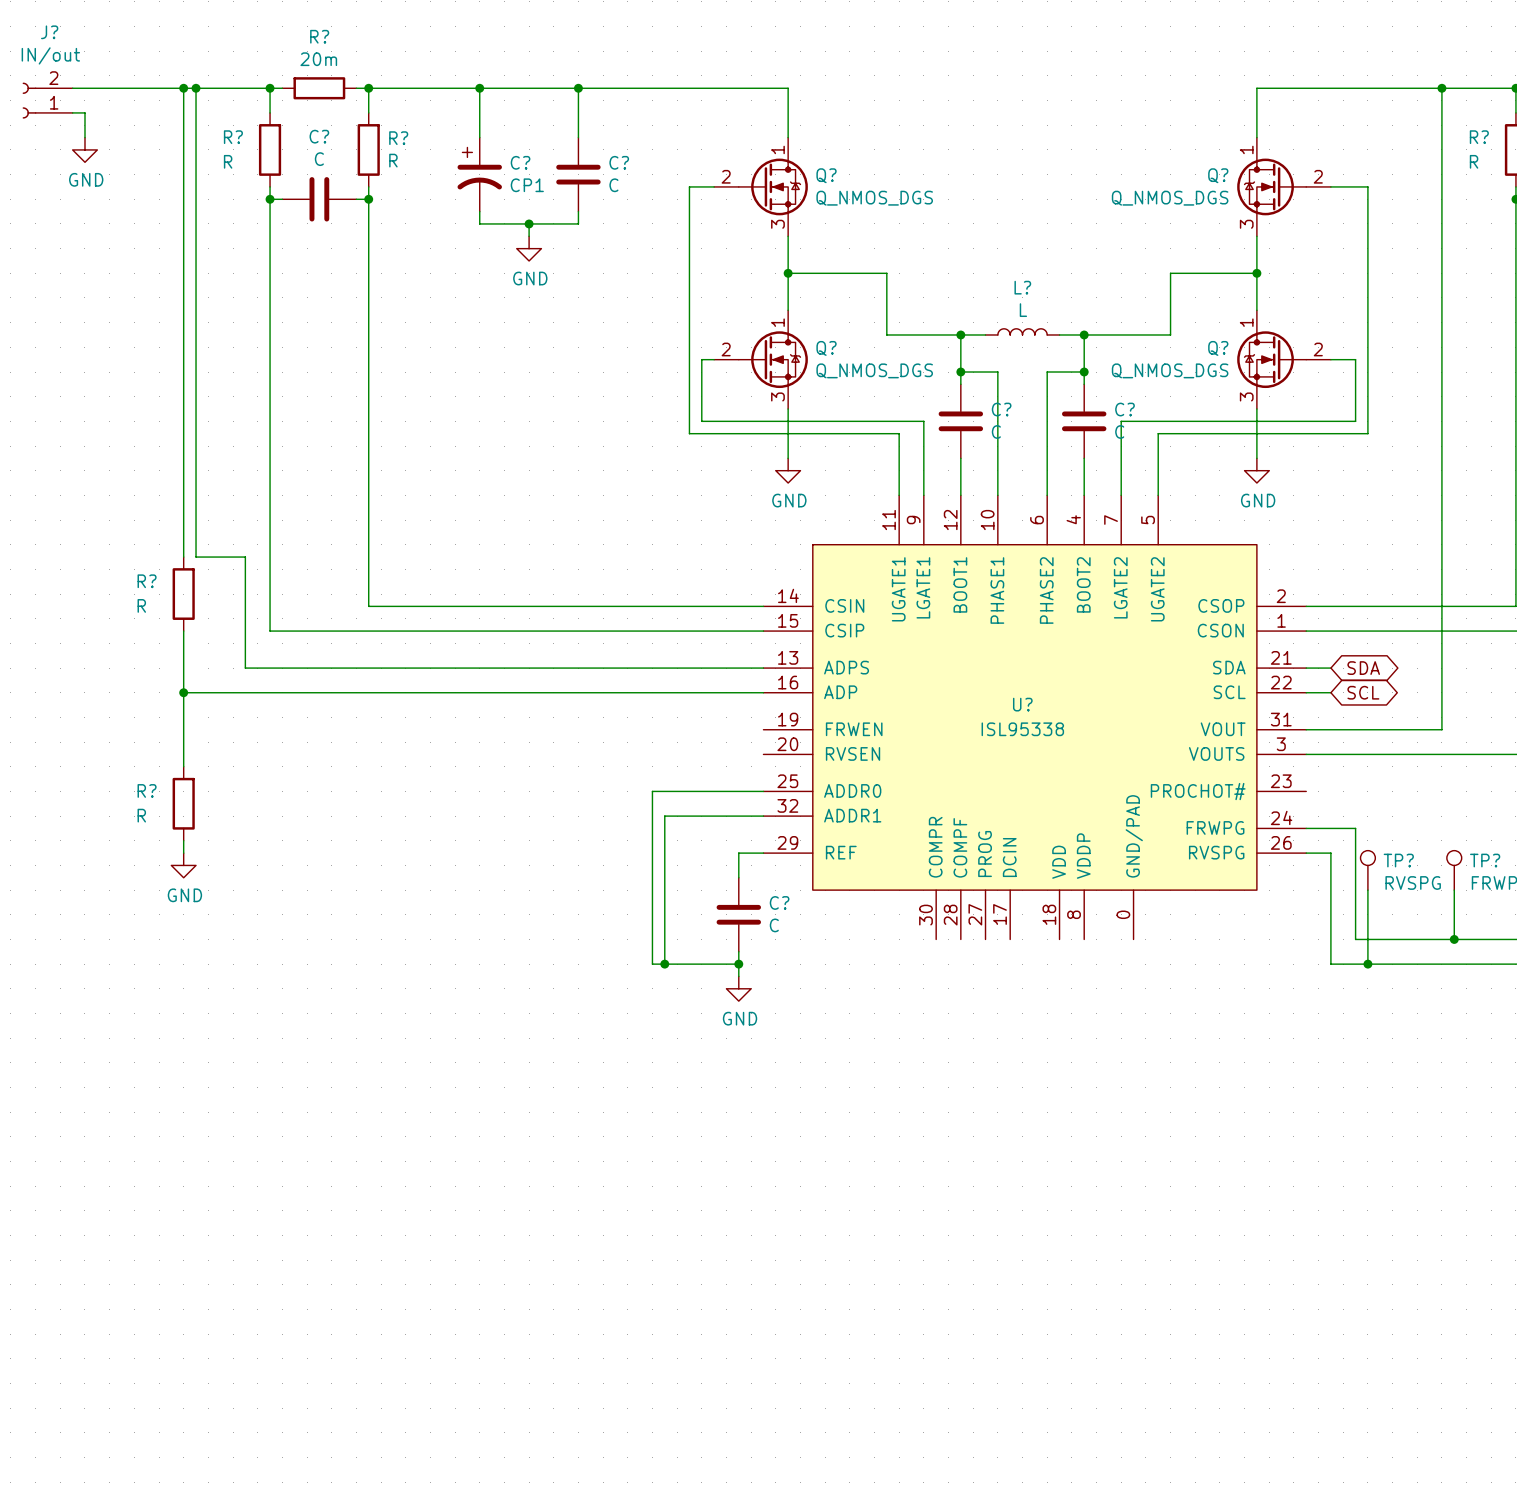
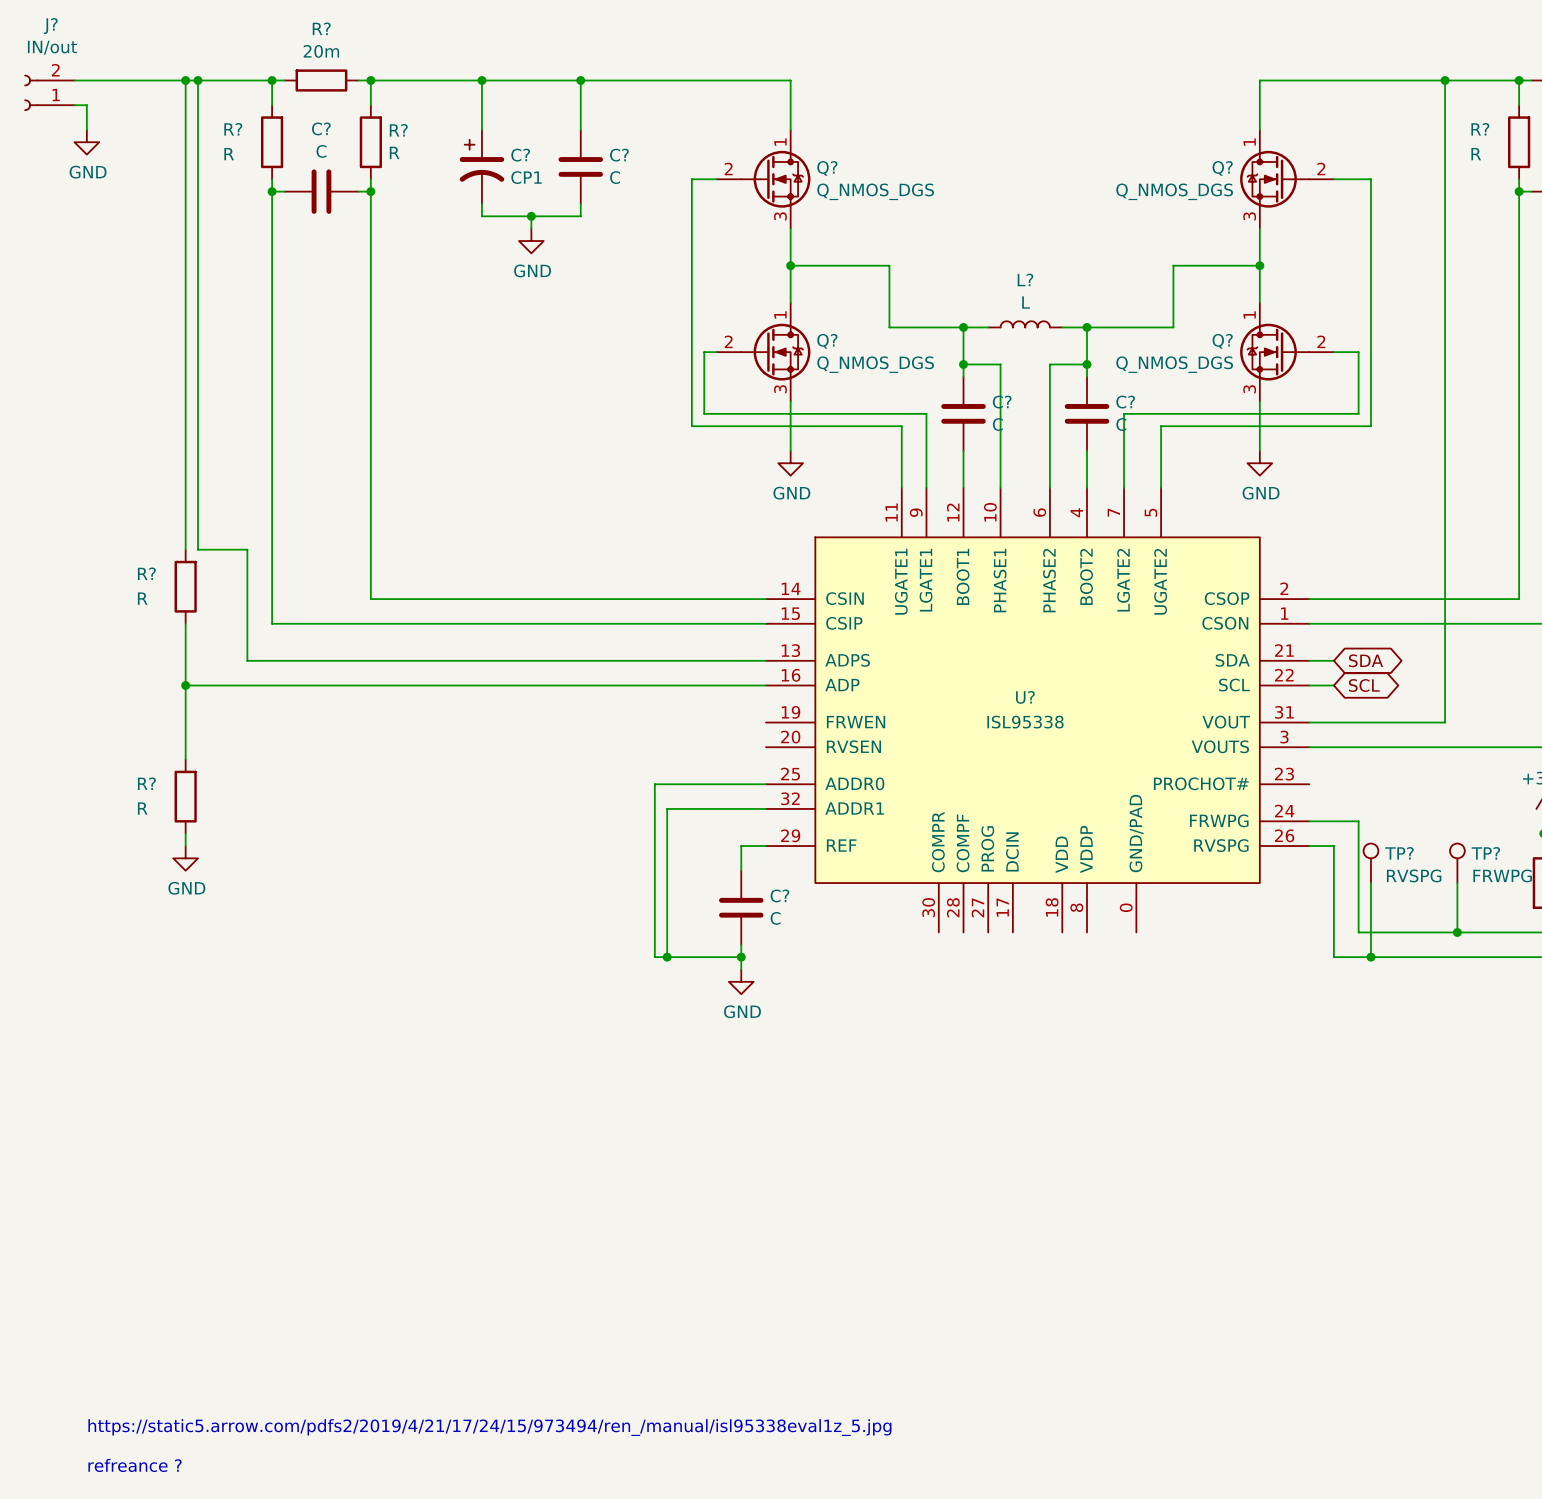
text: none -> https://static5.arrow.com/pdfs2/2019/4/21/17/24/15/973494/ren_/manual/isl95338eval1z_5.jpg (489, 1427)
text: none -> refreance ? (135, 1465)

